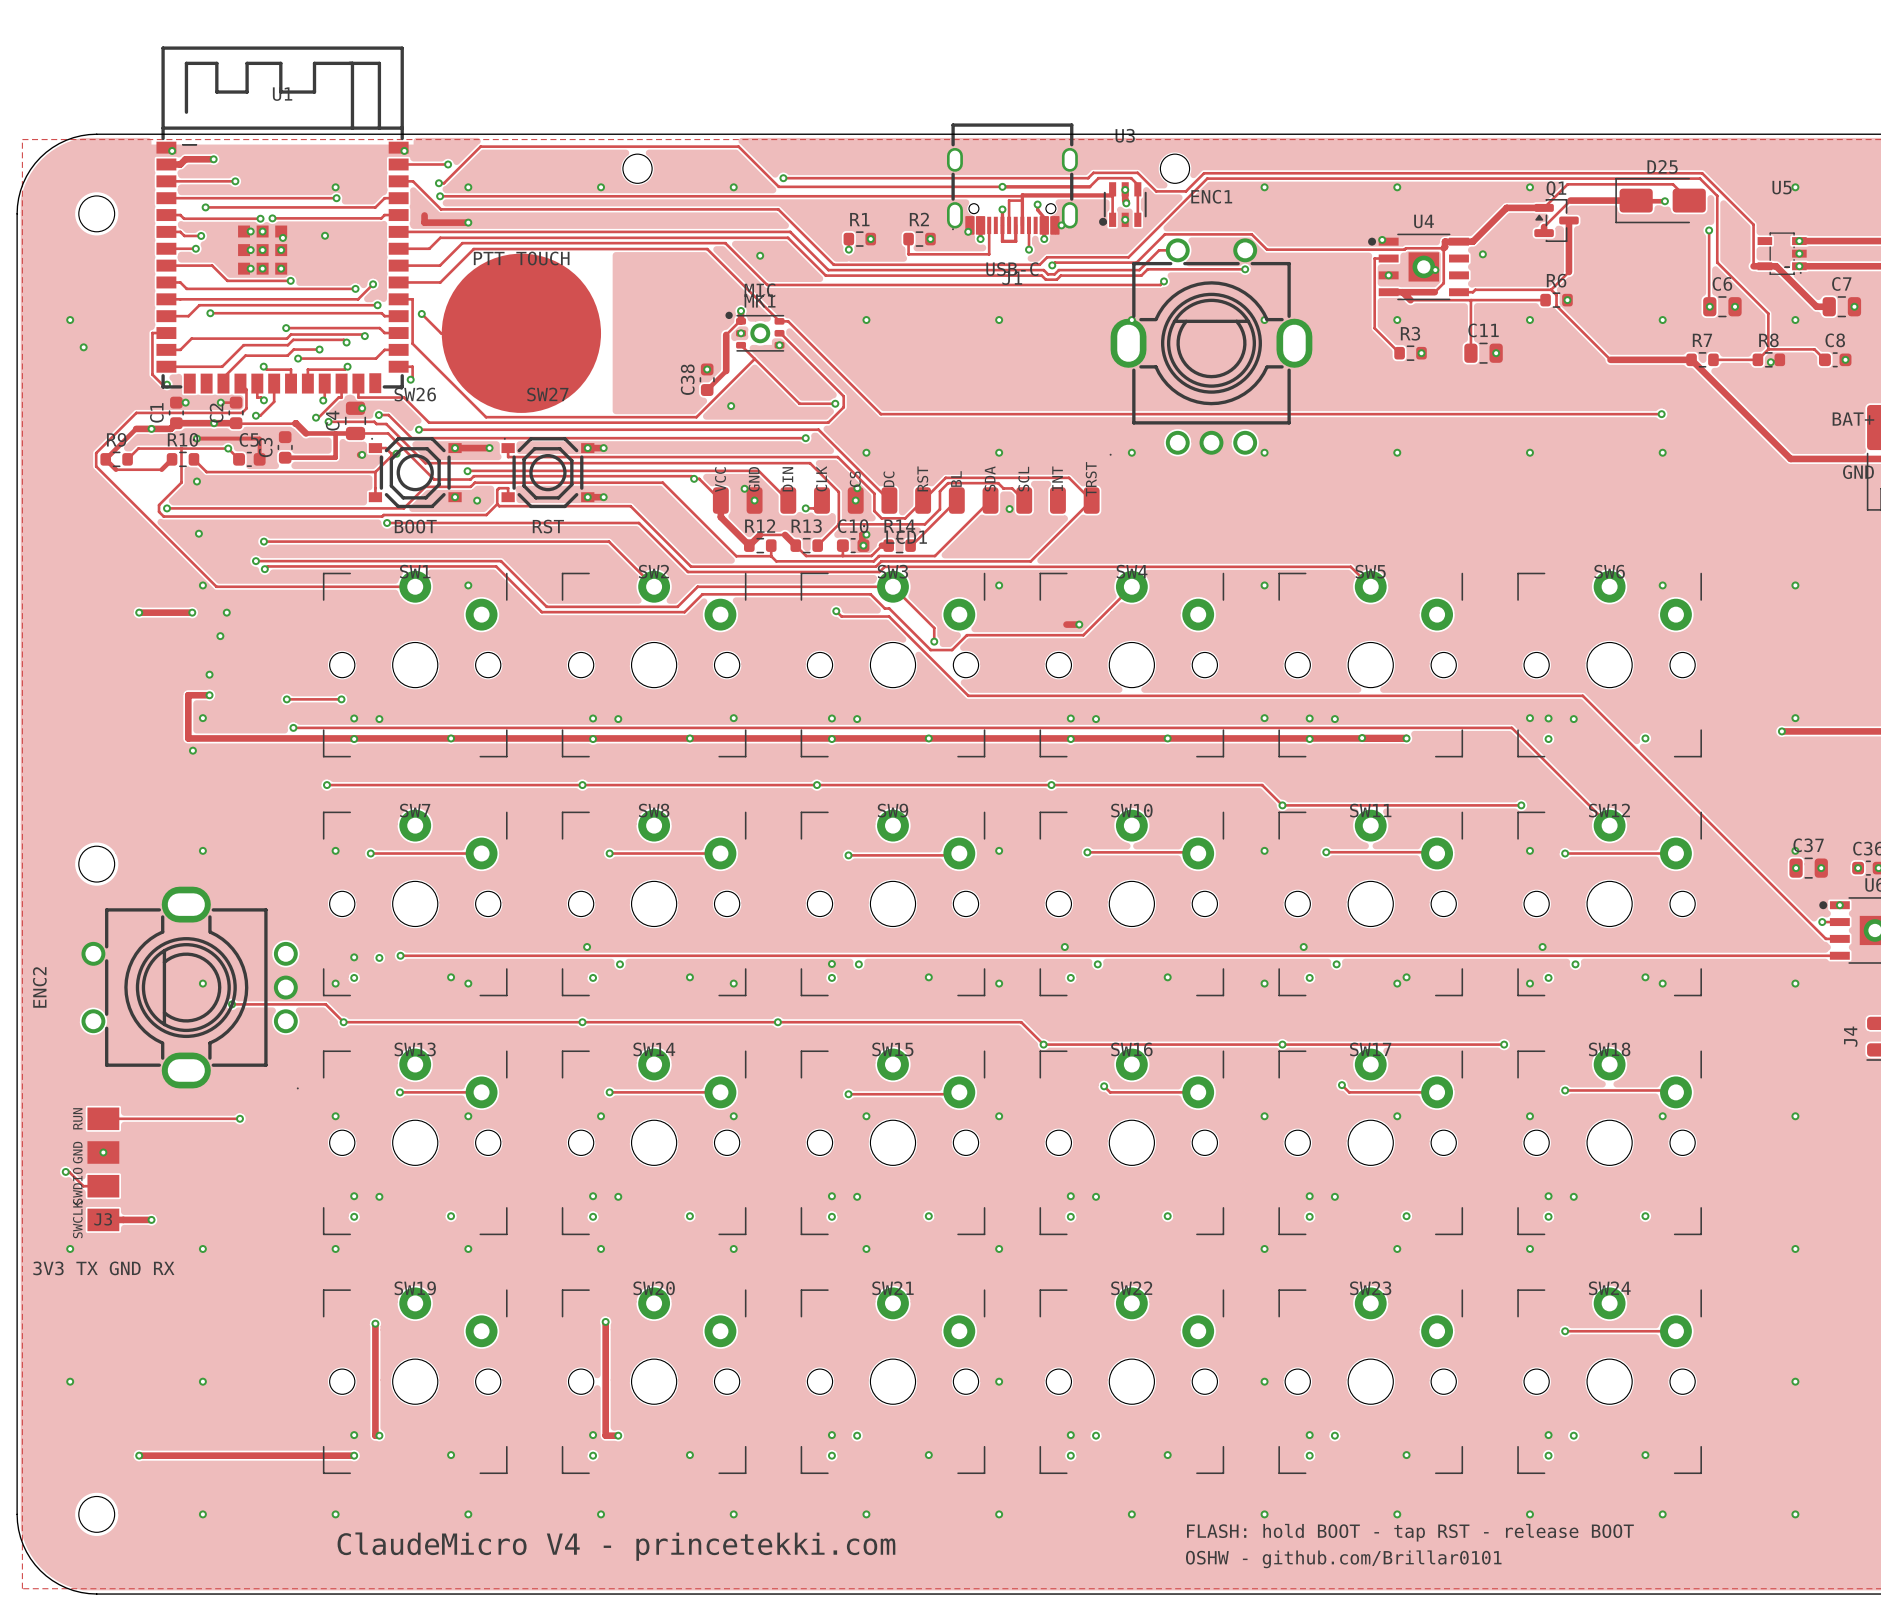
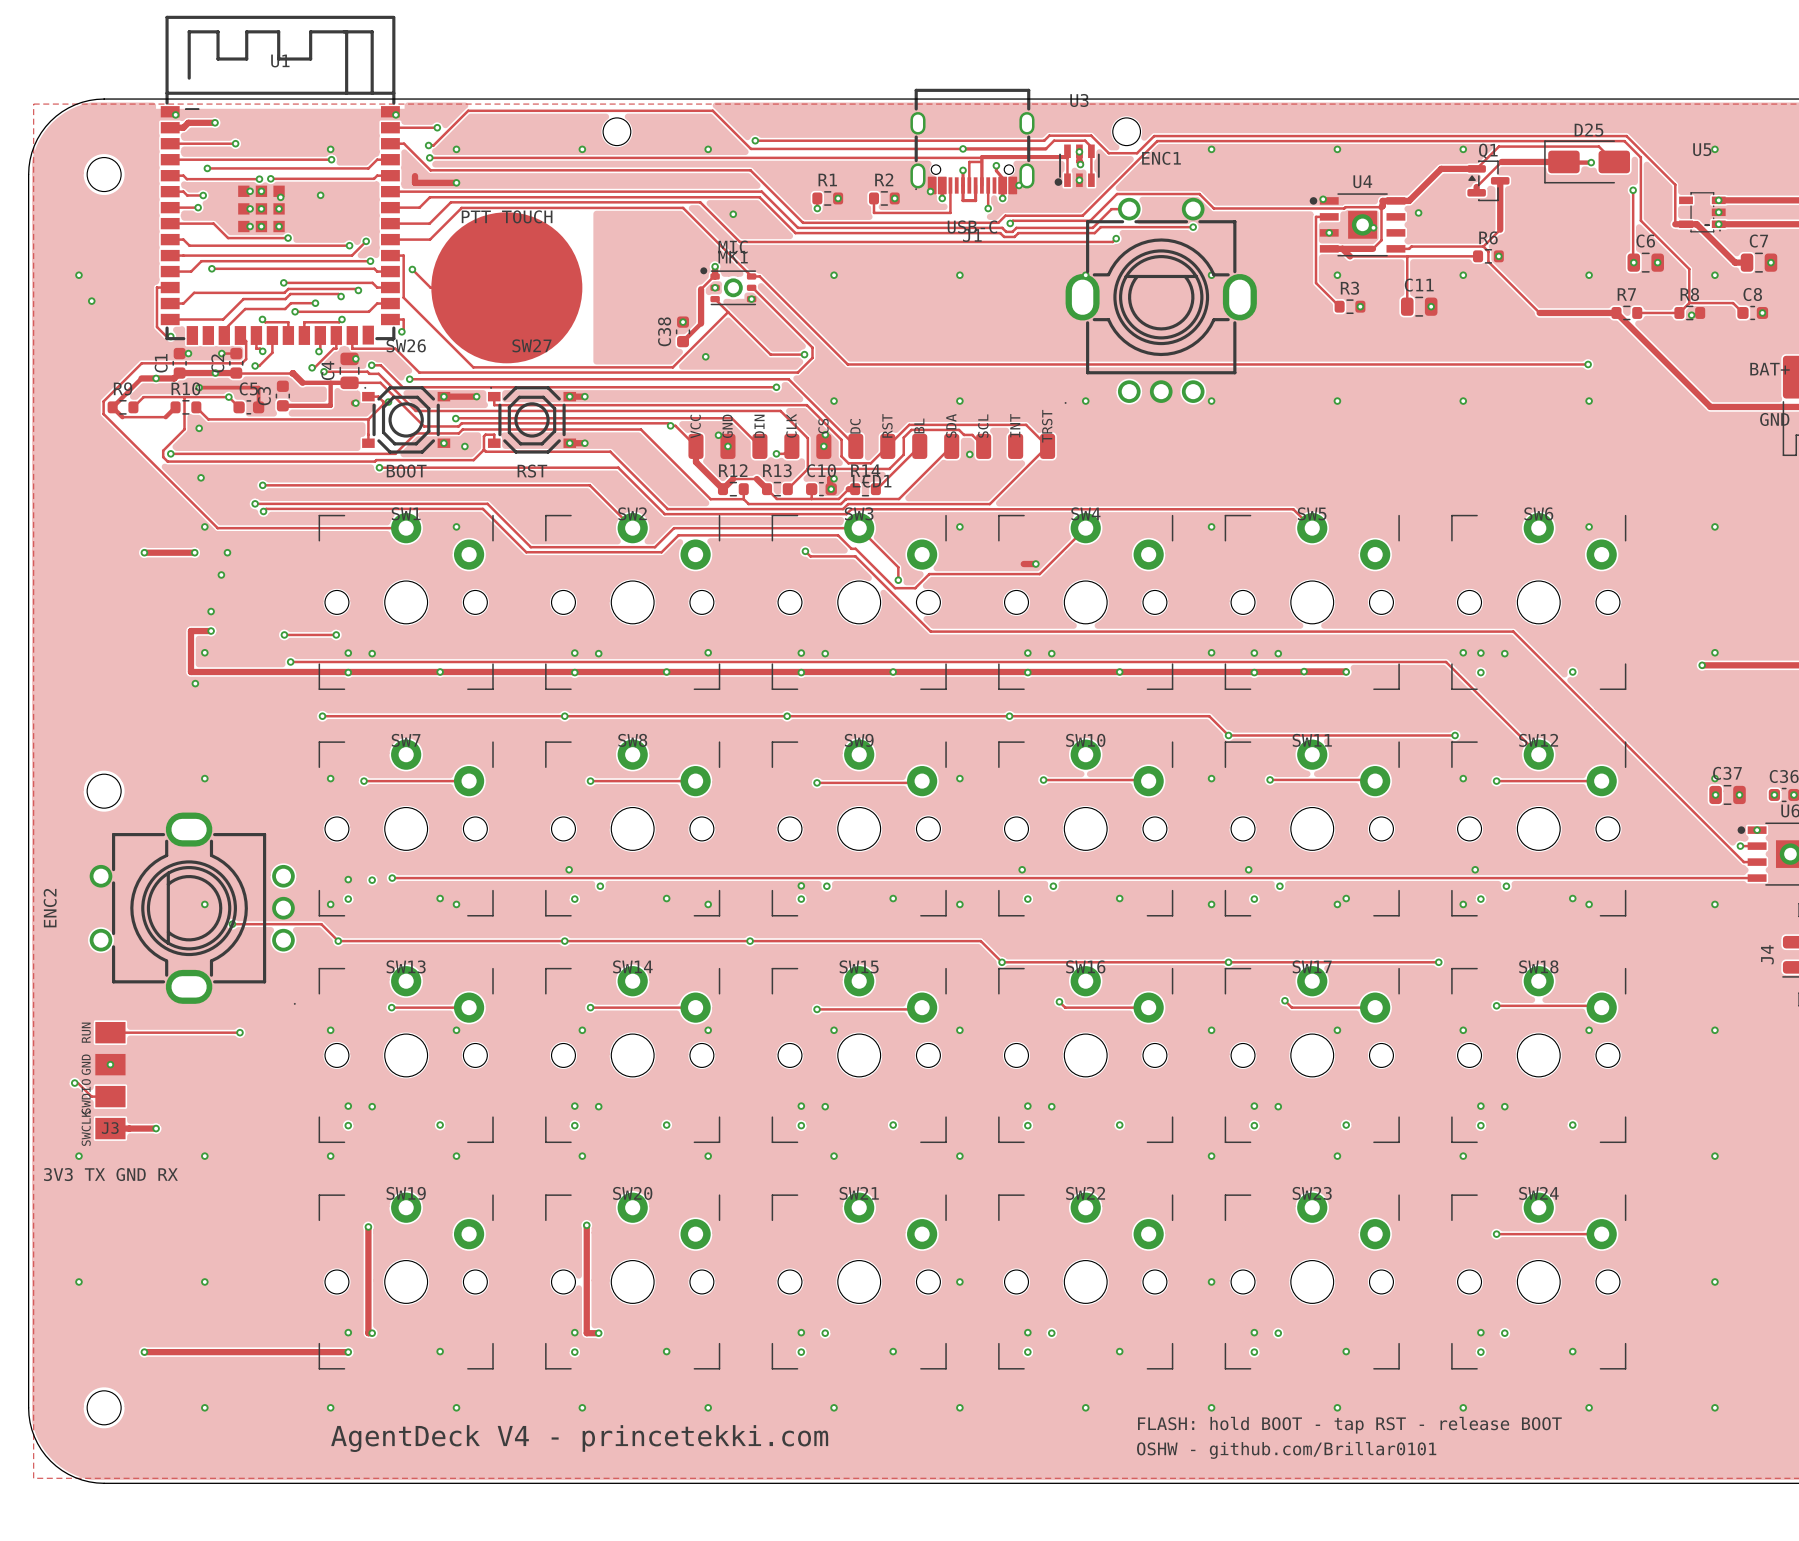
text: ClaudeMicro V4 - princetekki.com (616, 1546) -> AgentDeck V4 - princetekki.com (579, 1438)

